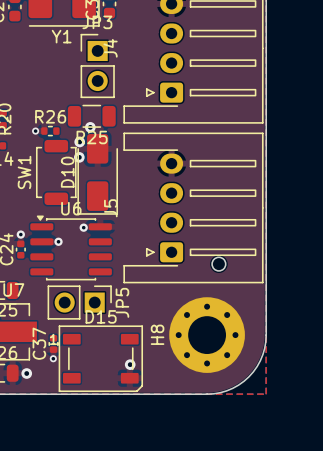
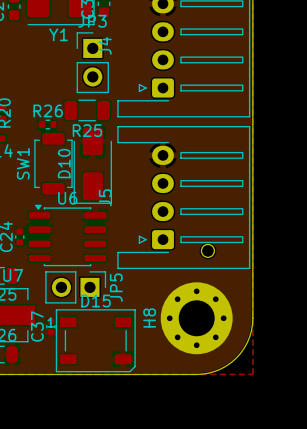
via: (90, 127) -> none
via: (35, 131) -> none
via: (79, 141) -> none
via: (79, 157) -> none
via: (83, 227) -> none
via: (20, 234) -> none
via: (58, 241) -> none
via: (53, 358) -> none
via: (130, 364) -> none
via: (26, 373) -> none

